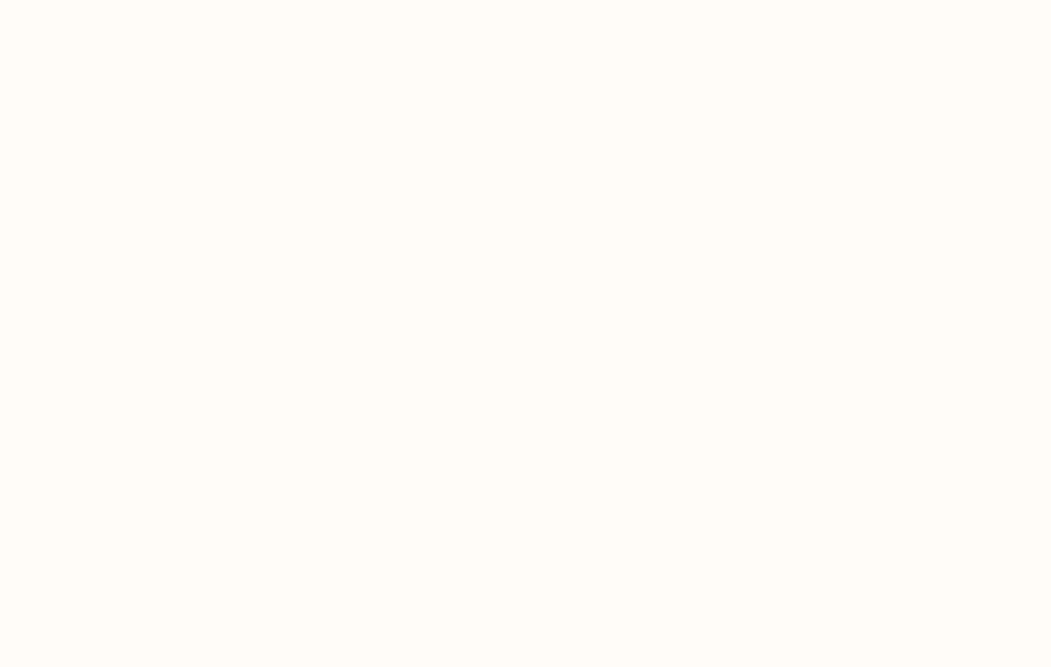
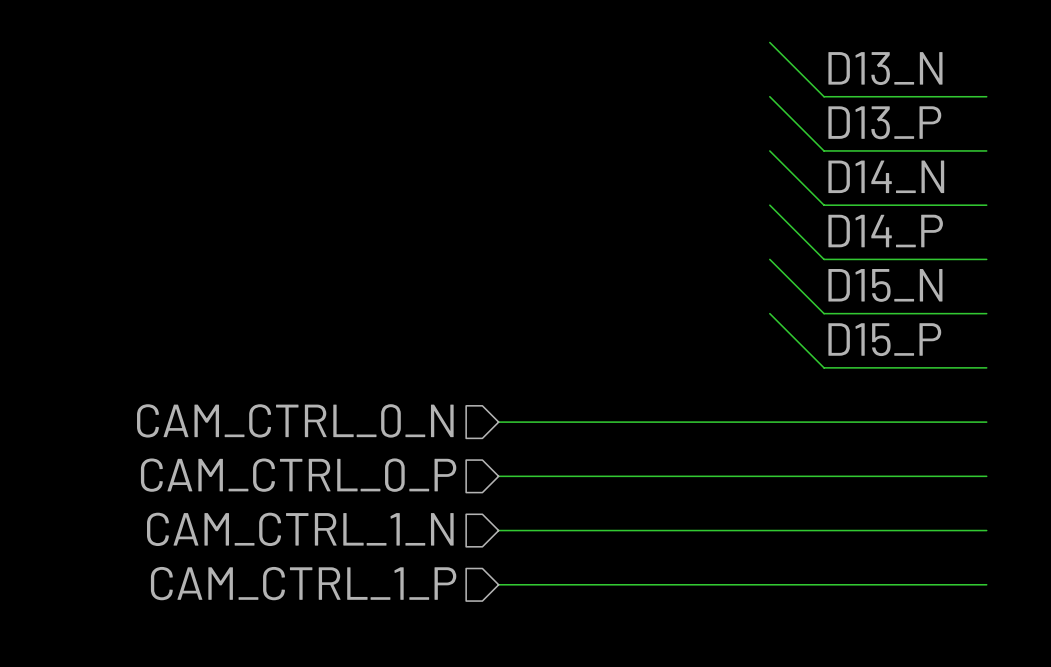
wire: none -> (769, 42) (824, 96) (986, 96)
label: none -> D13_N (885, 68)
wire: none -> (769, 96) (824, 150) (986, 150)
label: none -> D13_P (884, 122)
wire: none -> (769, 150) (824, 205) (986, 205)
label: none -> D14_N (886, 176)
wire: none -> (769, 205) (824, 259) (986, 259)
label: none -> D14_P (885, 231)
wire: none -> (769, 259) (824, 313) (986, 313)
label: none -> D15_N (885, 285)
wire: none -> (769, 313) (824, 367) (986, 367)
label: none -> D15_P (884, 339)
hierarchical label: none -> CAM_CTRL_0_N (295, 420)
wire: none -> (498, 422) (986, 422)
hierarchical label: none -> CAM_CTRL_0_P (298, 475)
wire: none -> (498, 476) (986, 476)
hierarchical label: none -> CAM_CTRL_1_N (300, 529)
wire: none -> (498, 530) (986, 530)
wire: none -> (498, 584) (986, 584)
hierarchical label: none -> CAM_CTRL_1_P (303, 583)

